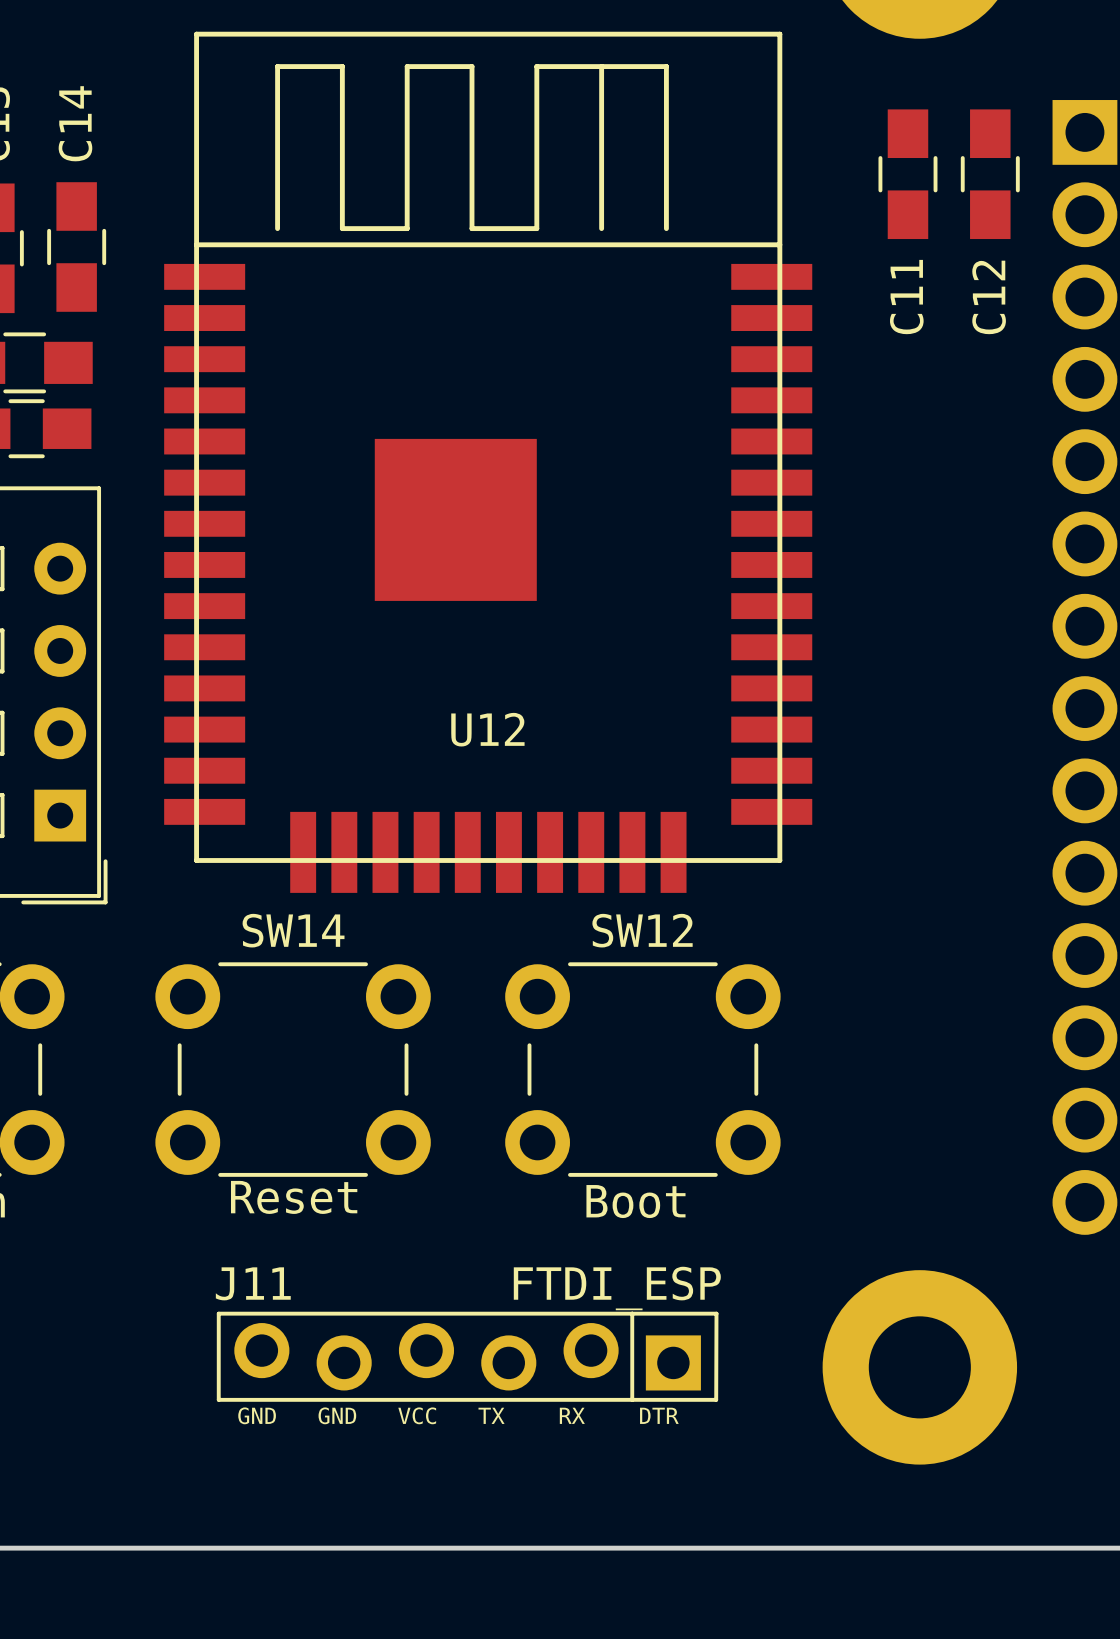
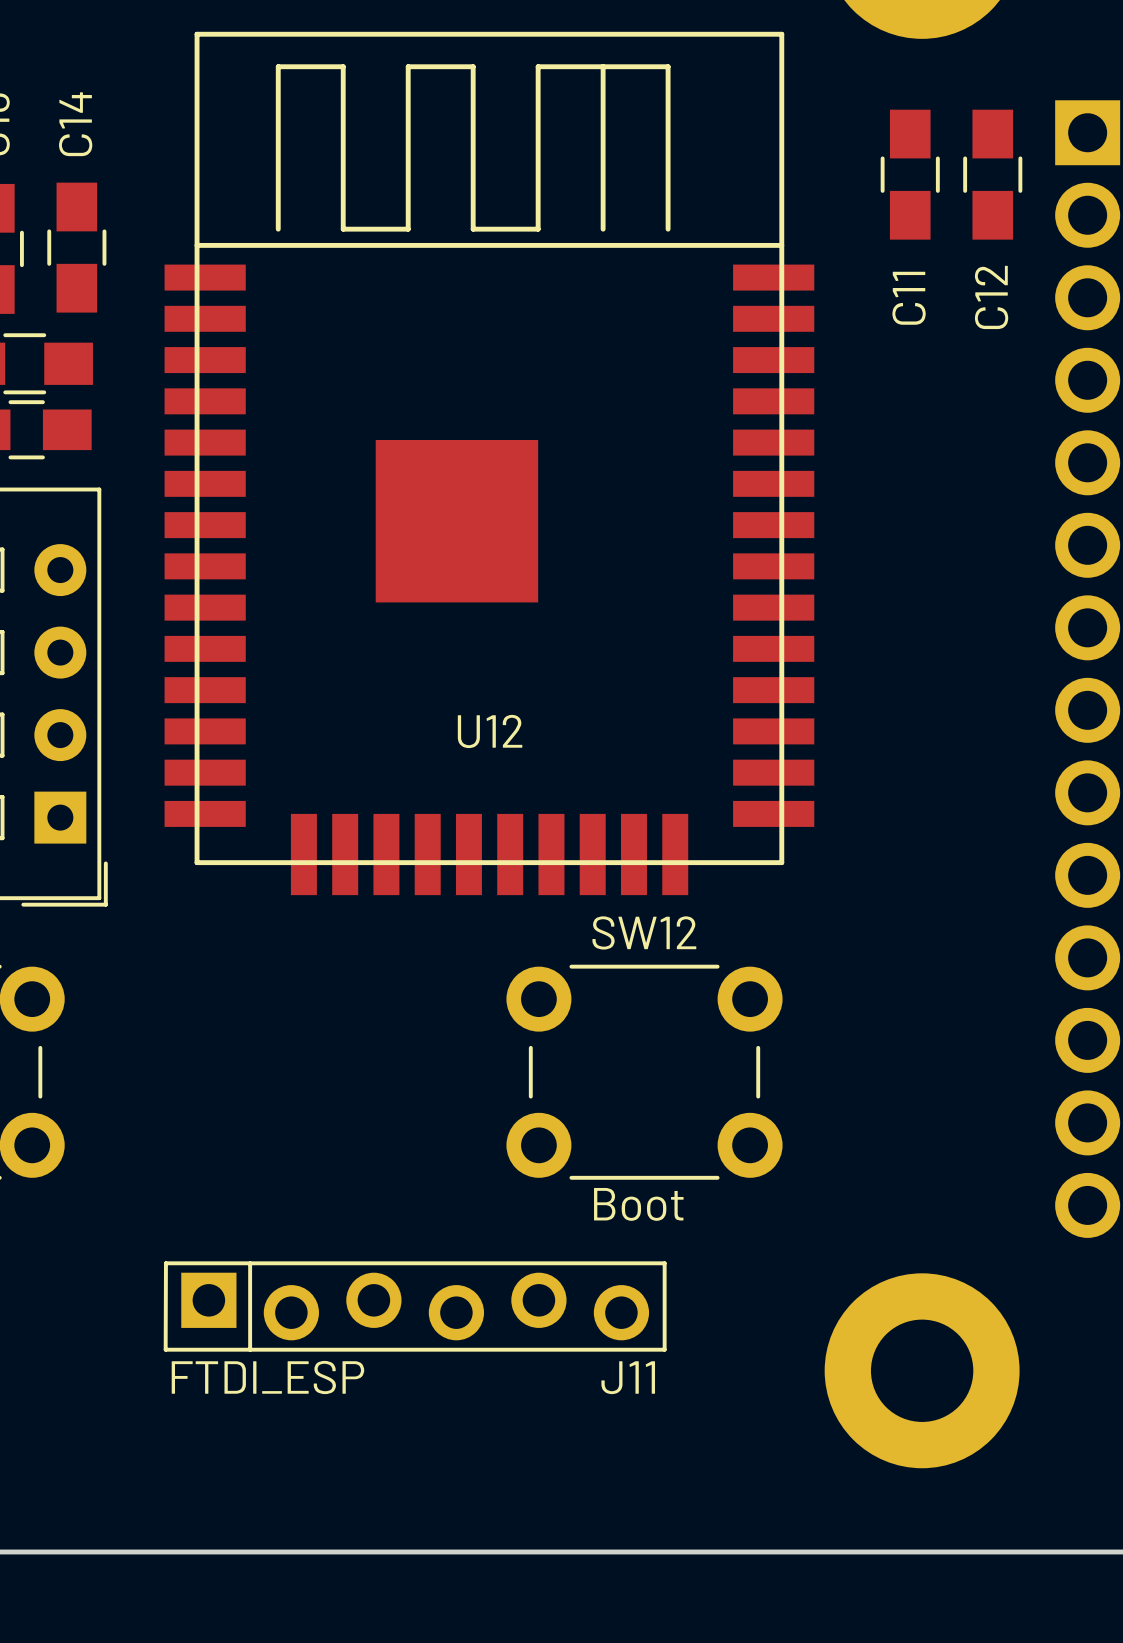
SW14: Reset (293, 1069) -> none
J11 rotation: 0° (467, 1356) -> 180° (415, 1306)
text: GND GND VCC TX RX DTR (458, 1415) -> none

